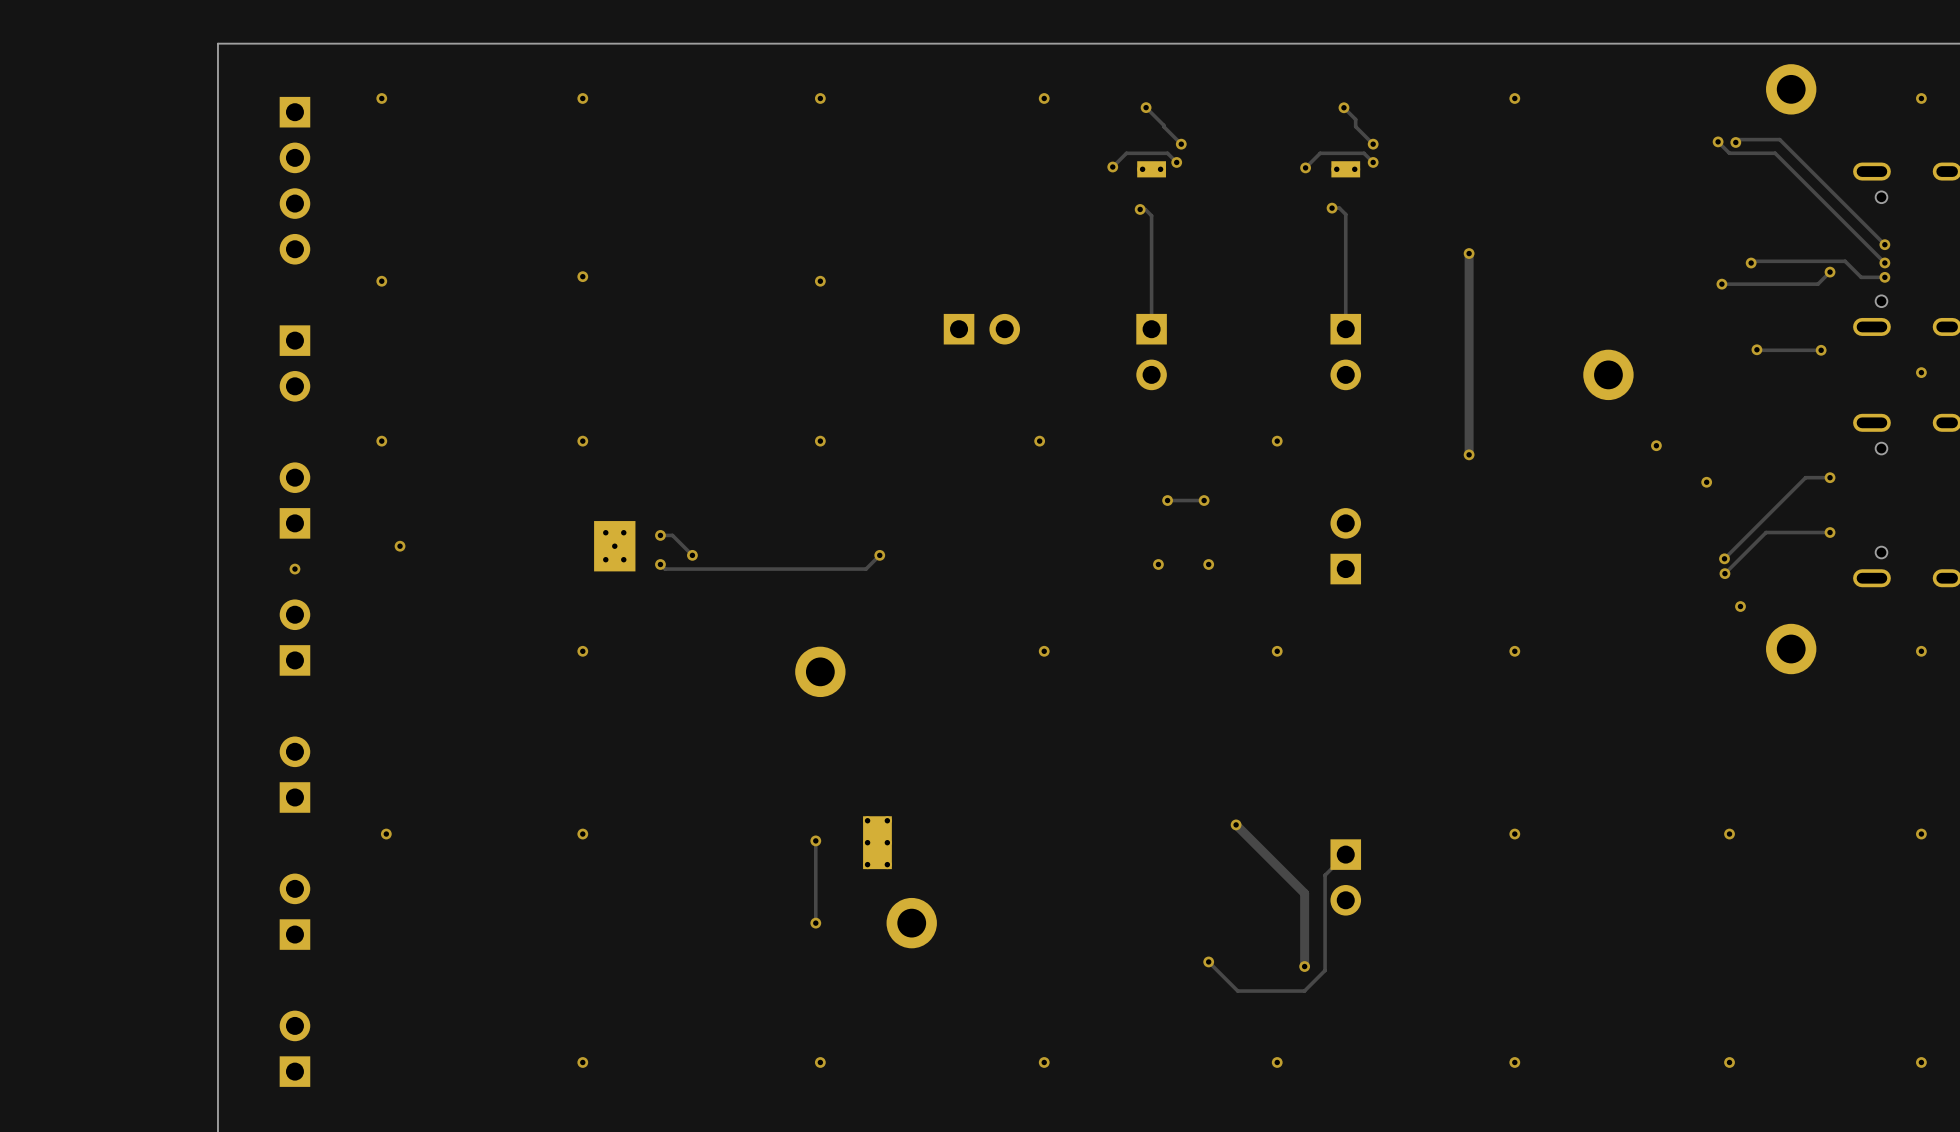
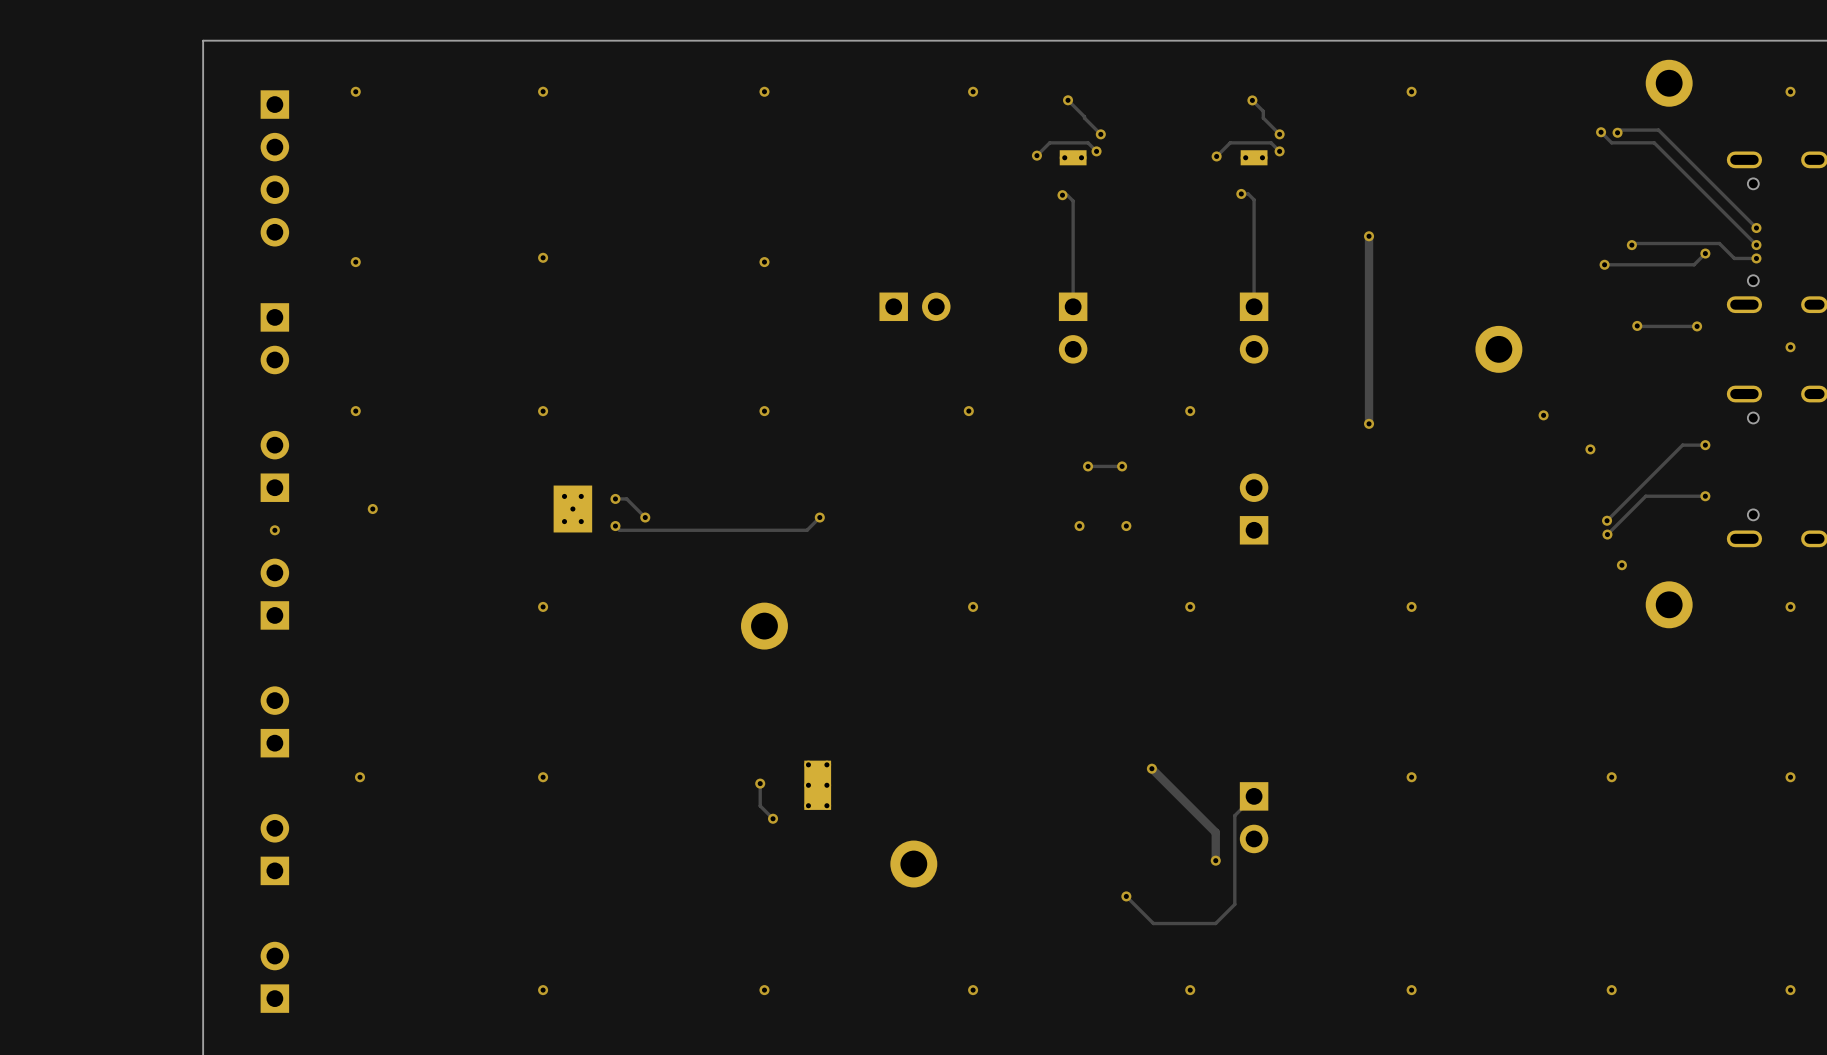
track: (815, 864) (815, 923) -> (760, 805) (773, 818)
via position: (815, 923) -> (773, 818)
part position: (911, 923) -> (913, 864)
track: (1304, 923) (1304, 966) -> none
via position: (1304, 966) -> (1215, 860)

